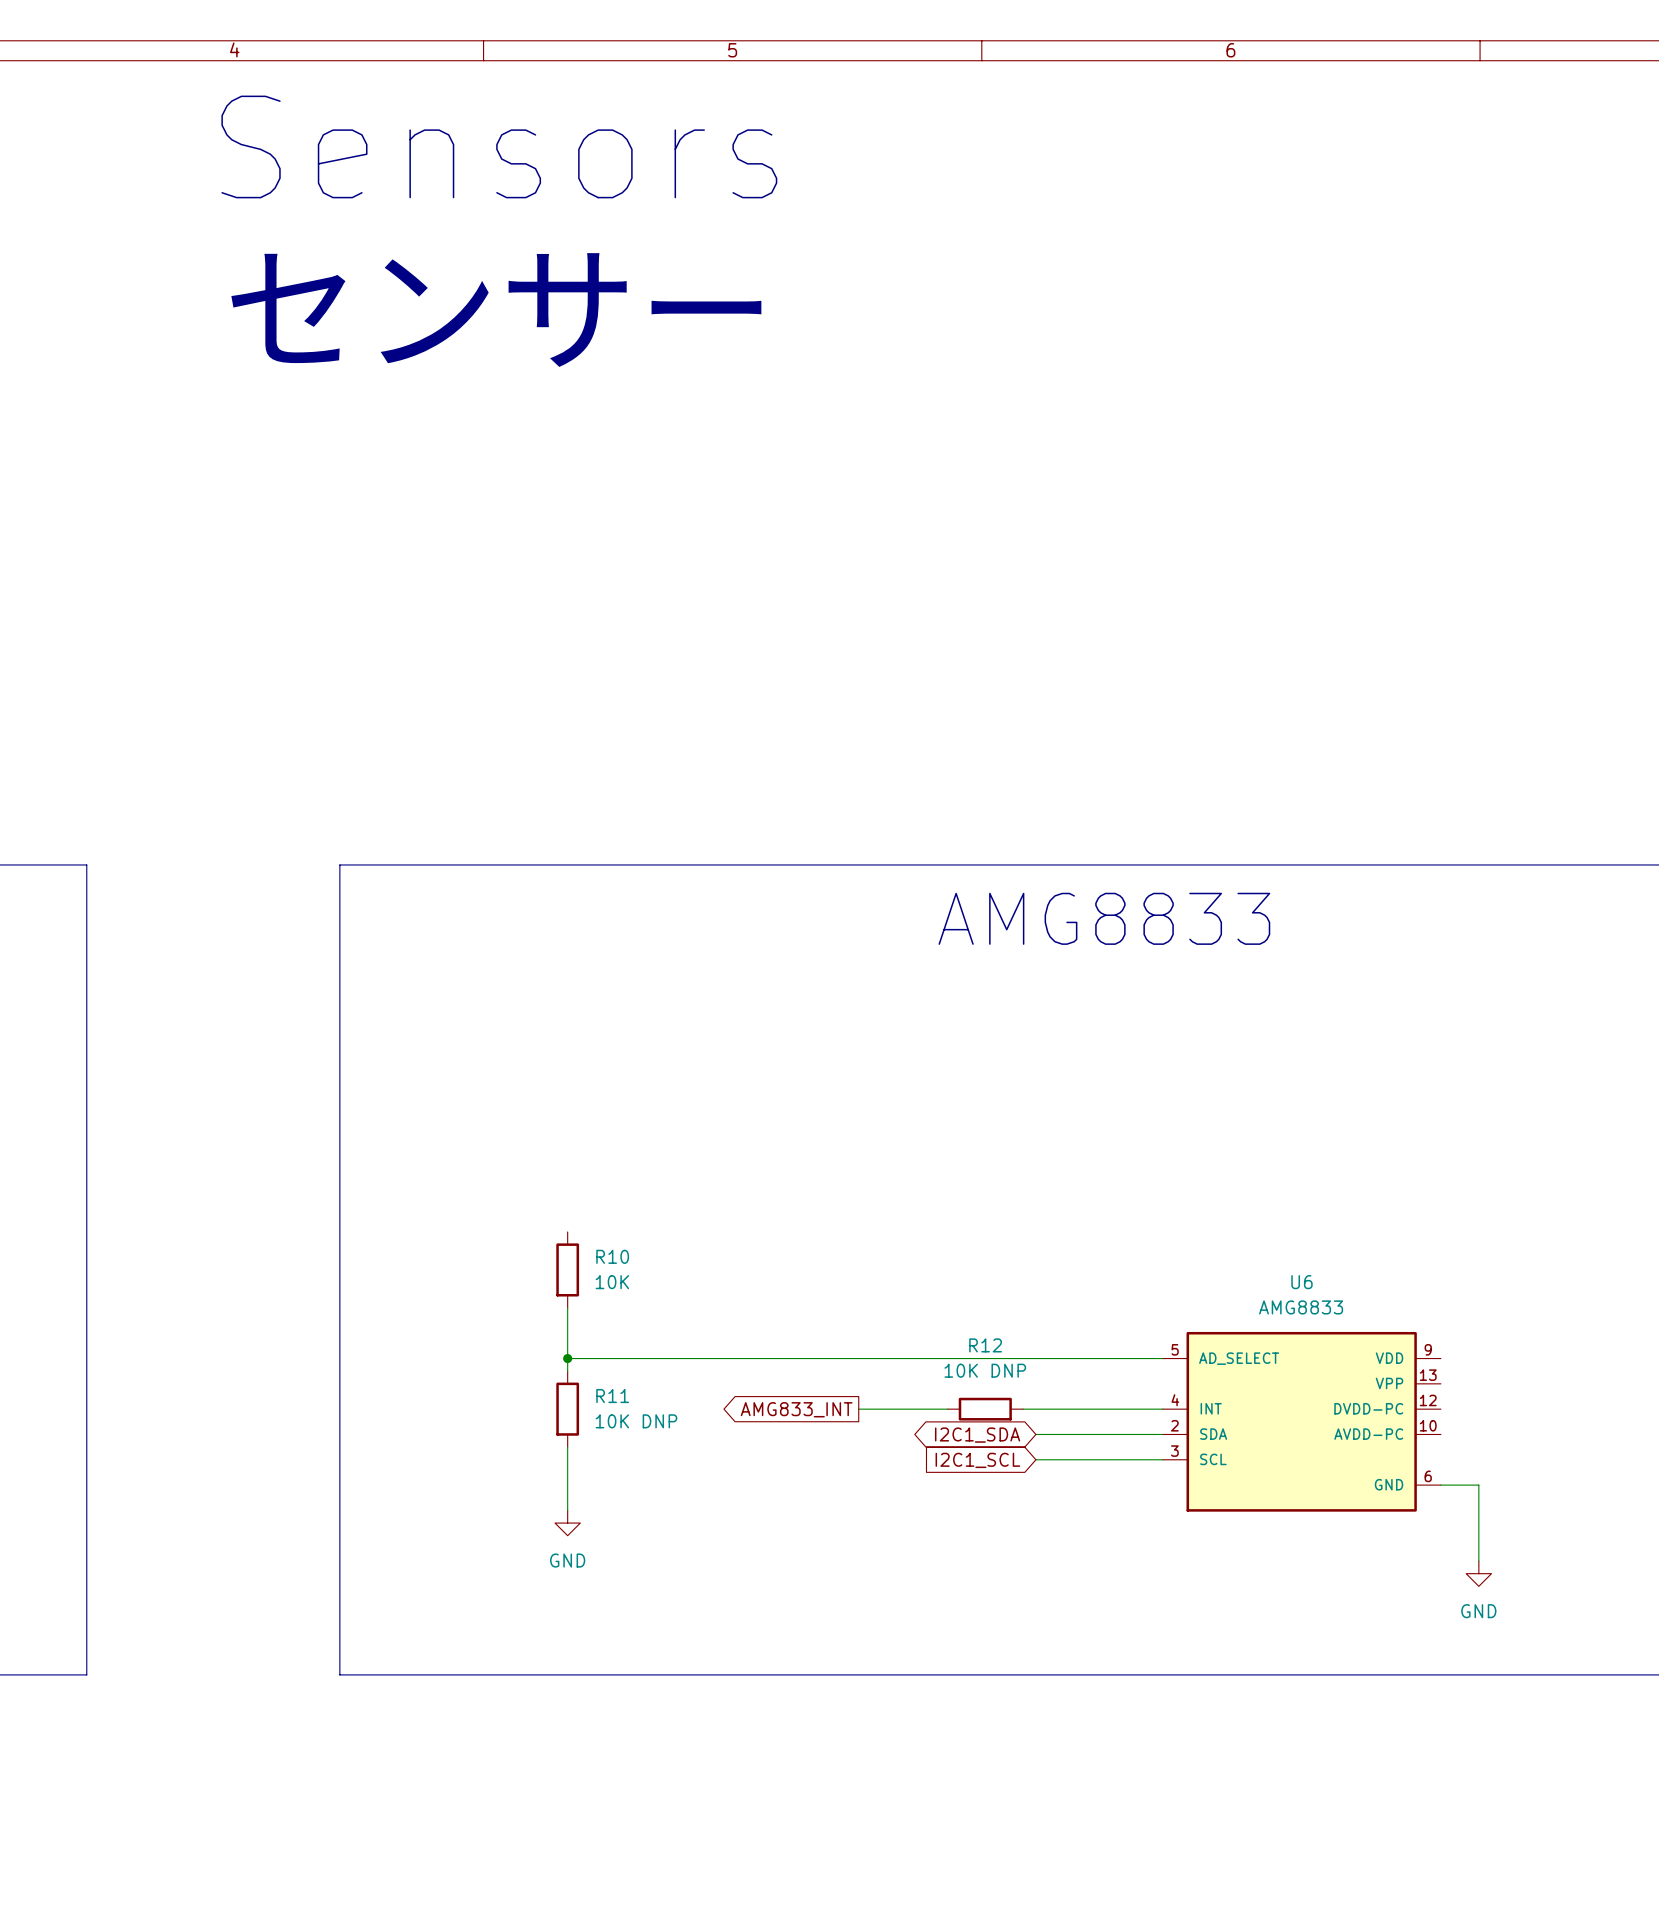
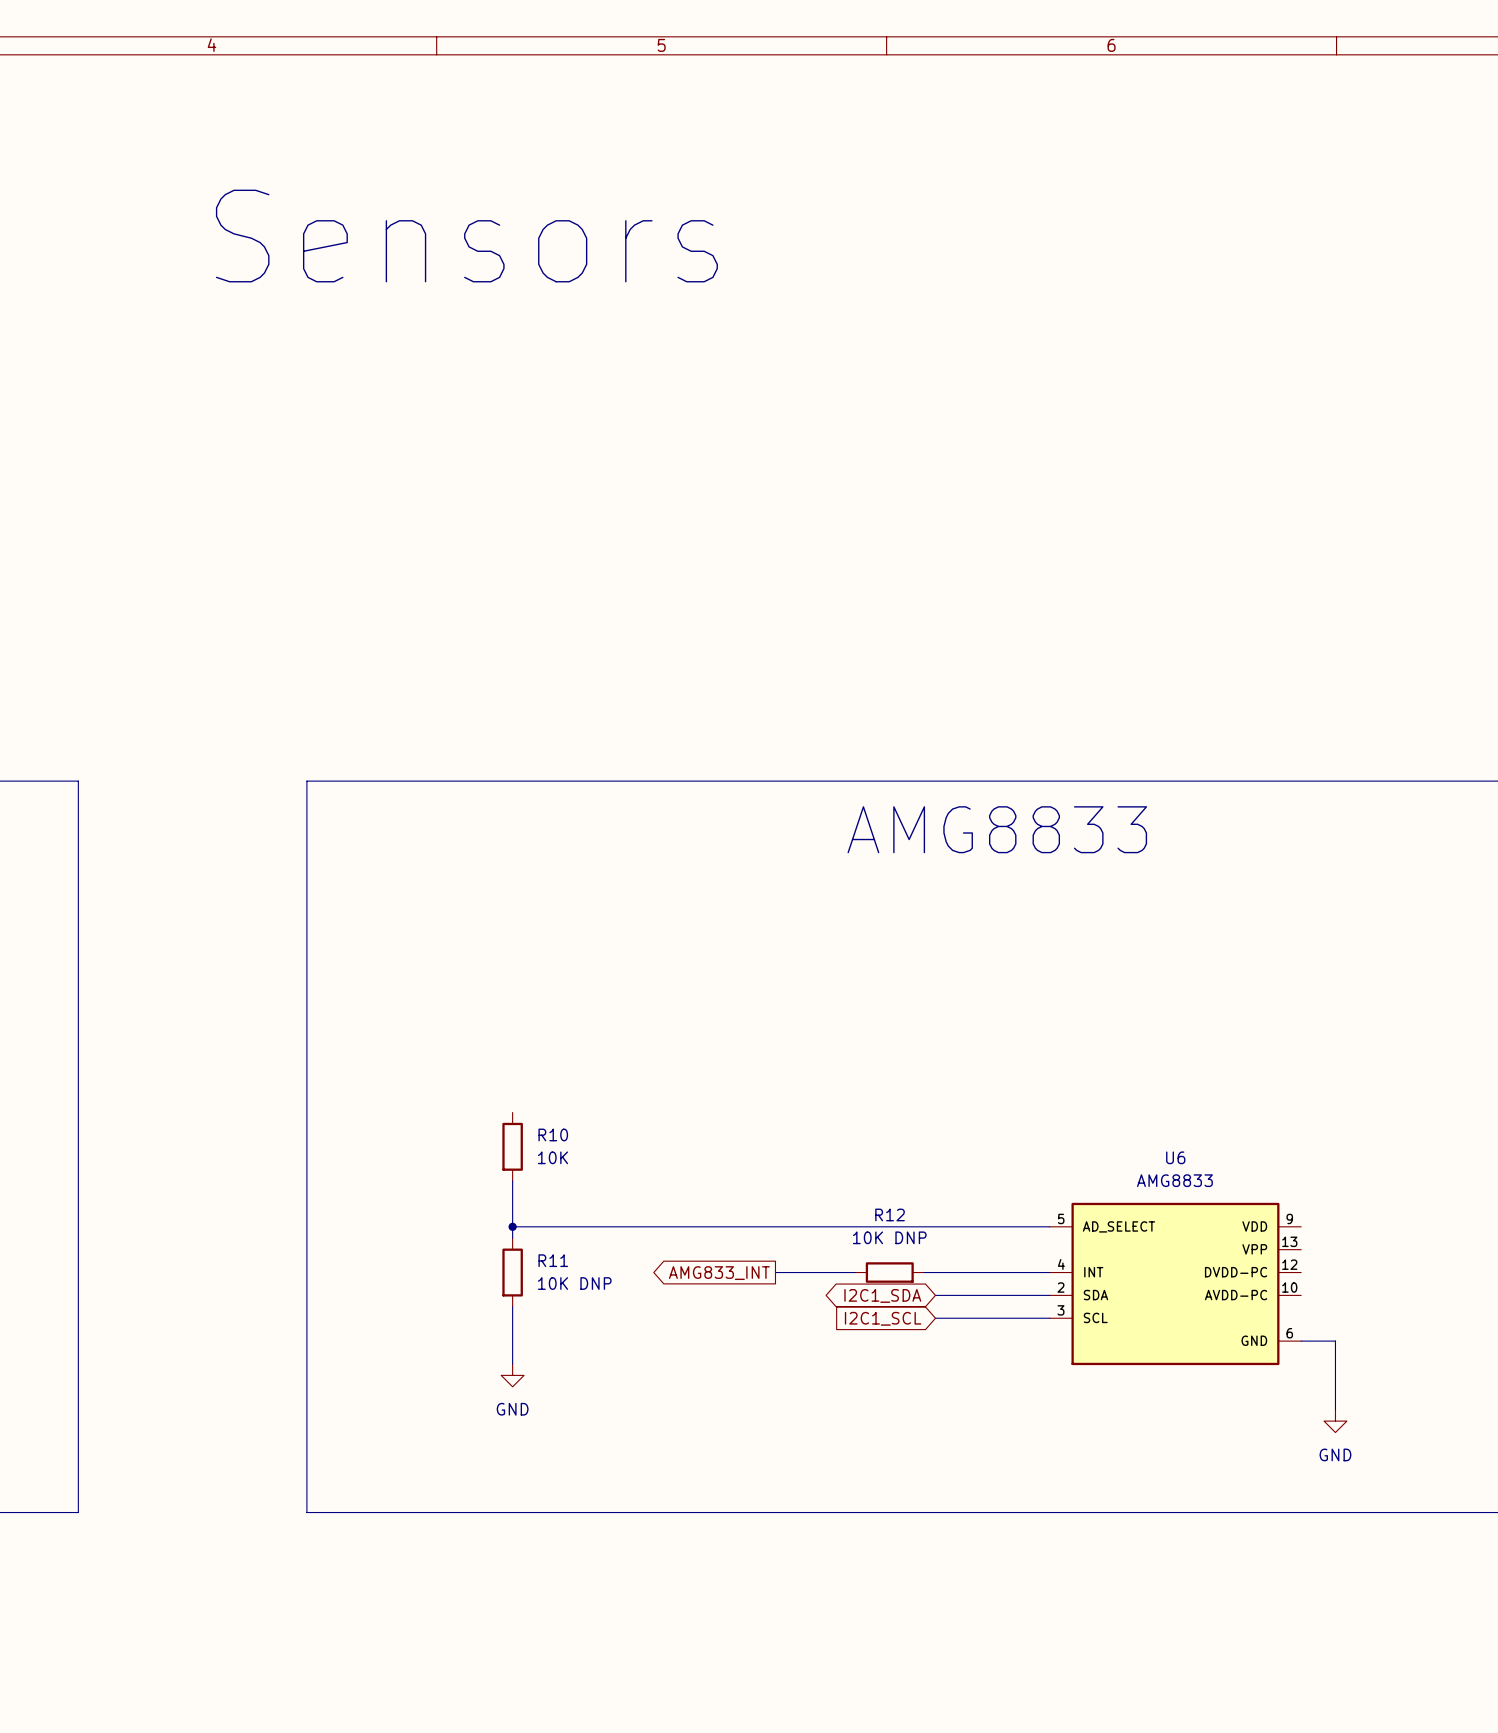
text position: Sensors (499, 146) -> Sensors (466, 236)
text: センサー (496, 310) -> none

